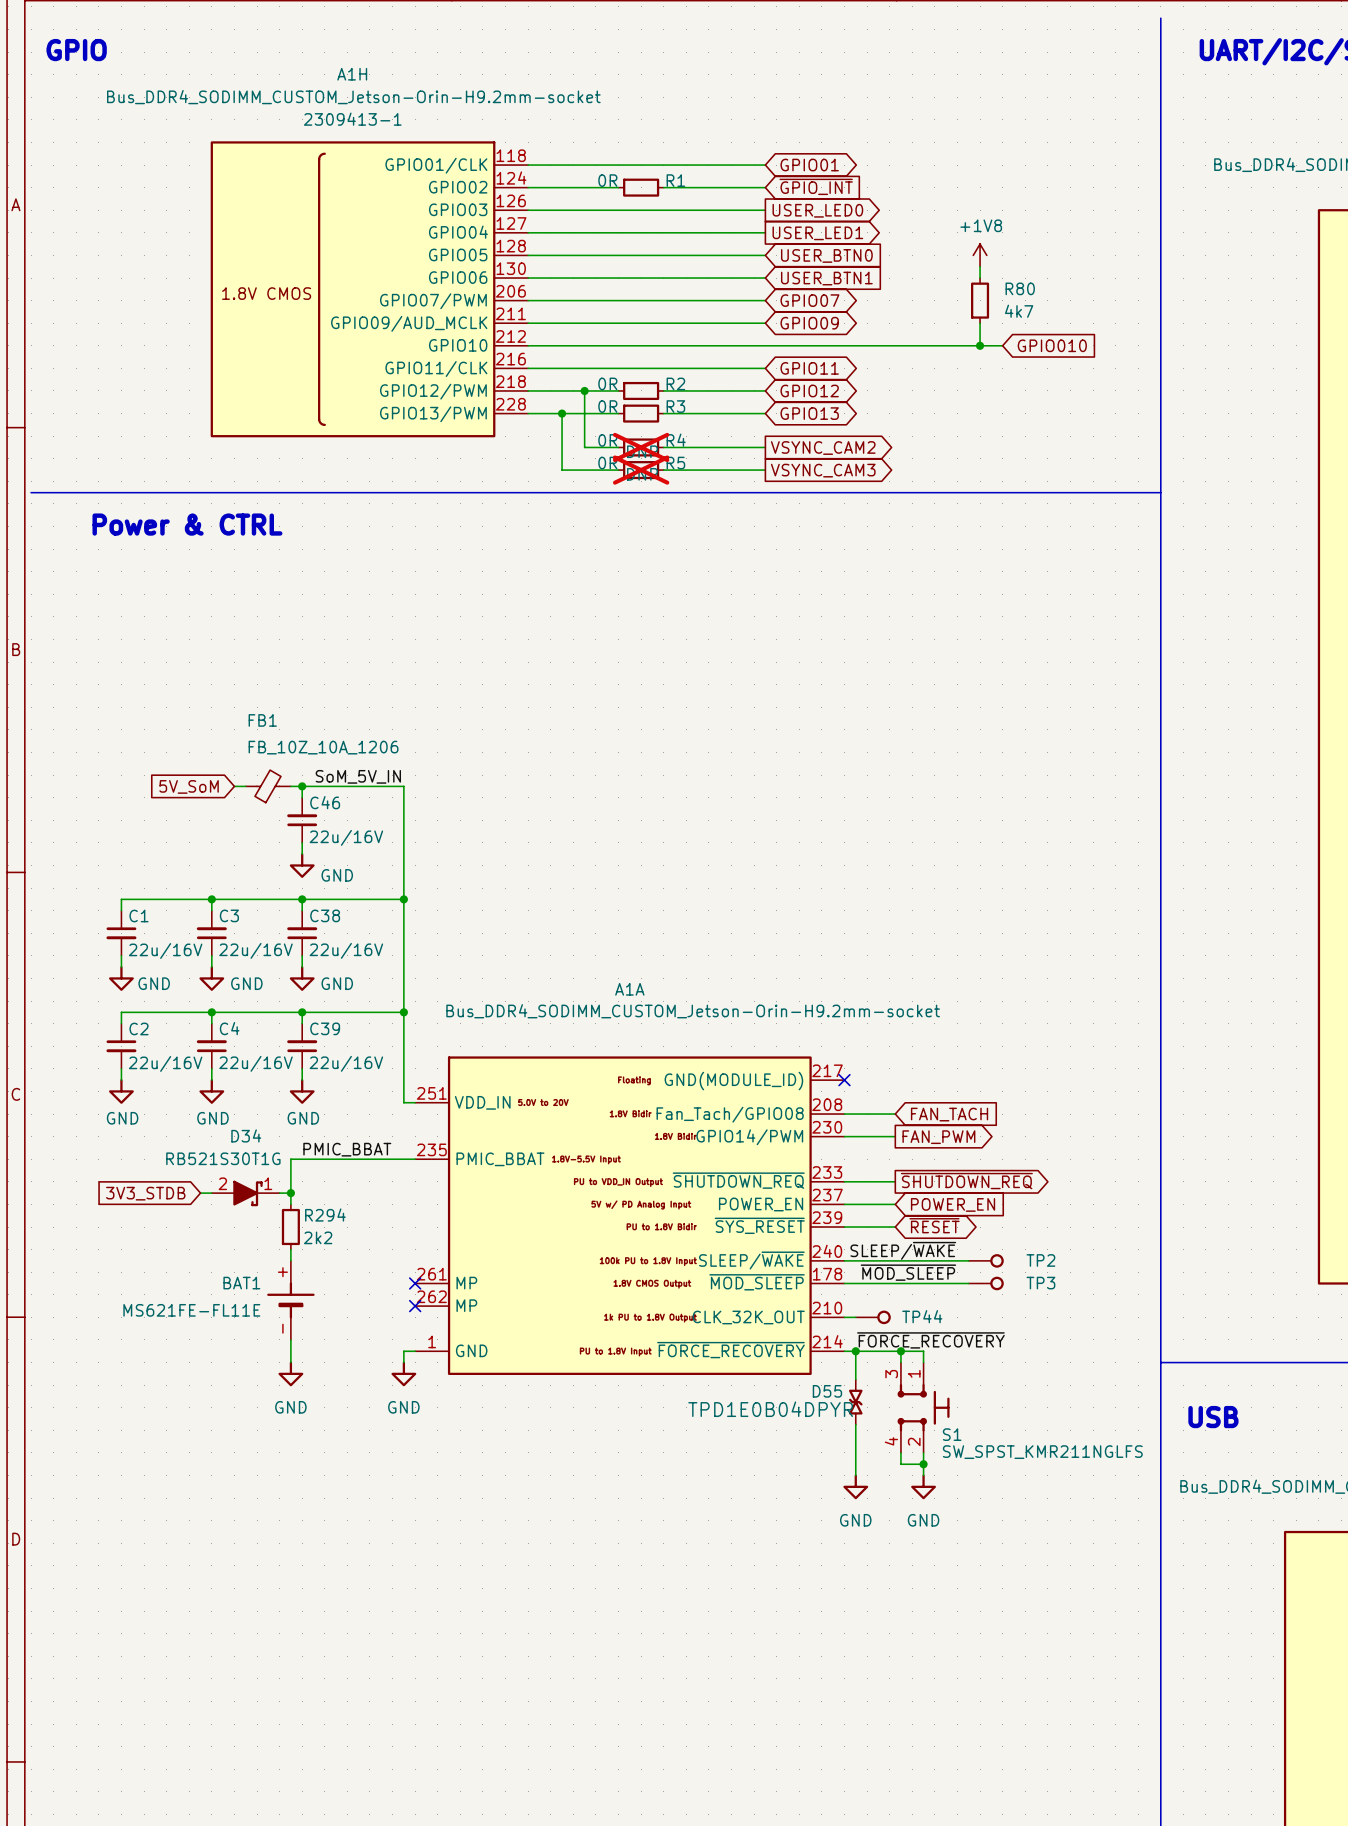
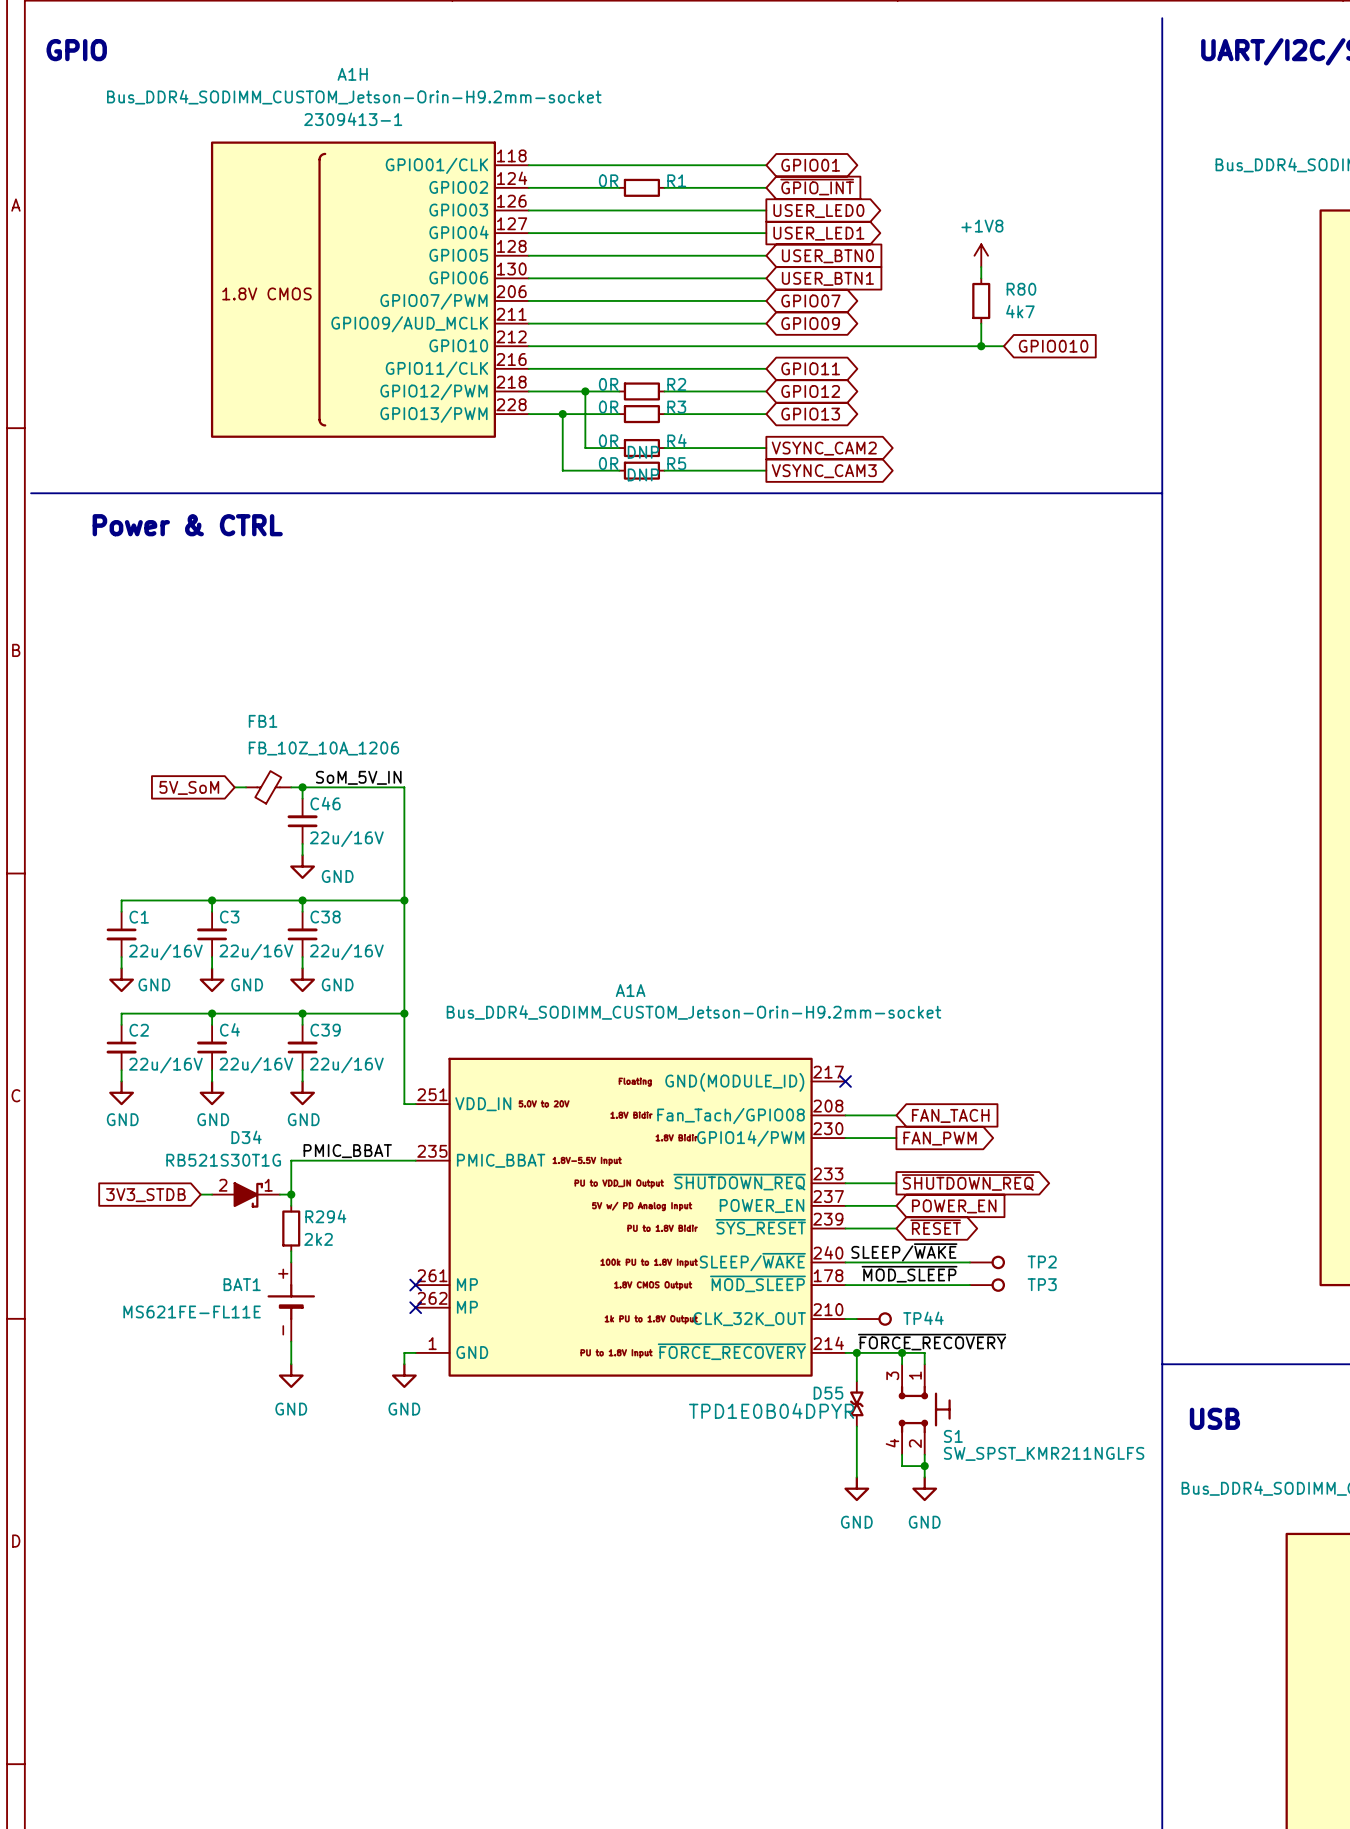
R4 do-not-place cross: (641, 447) -> none
R5 do-not-place cross: (641, 470) -> none

